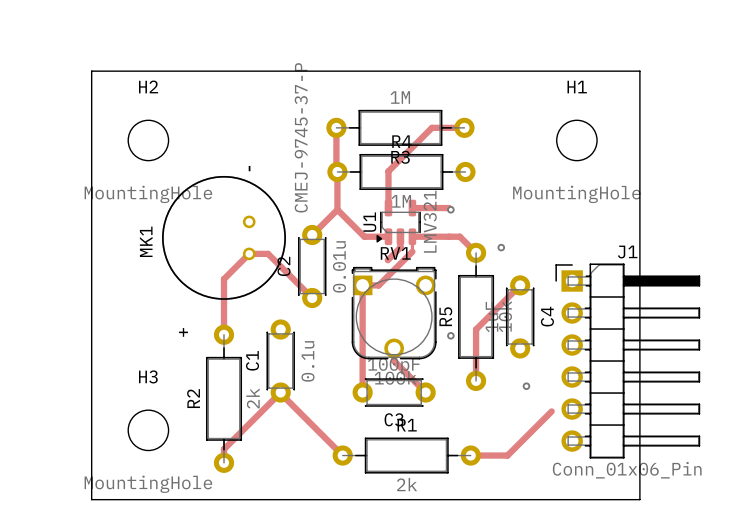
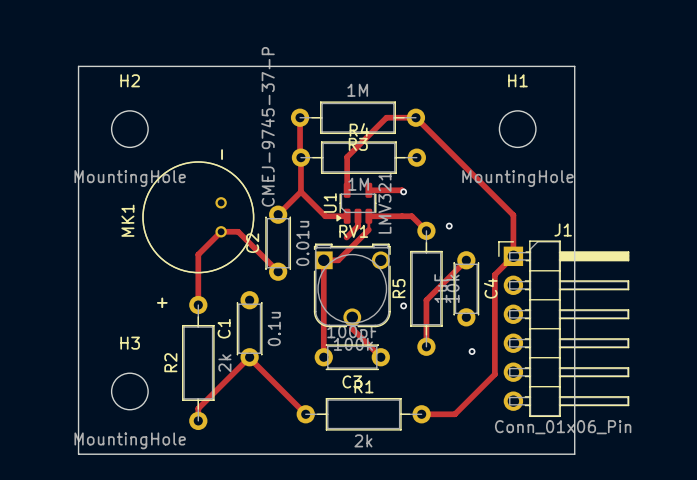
track: none -> (415, 117) (513, 215) (513, 256) (494, 274) (494, 374)

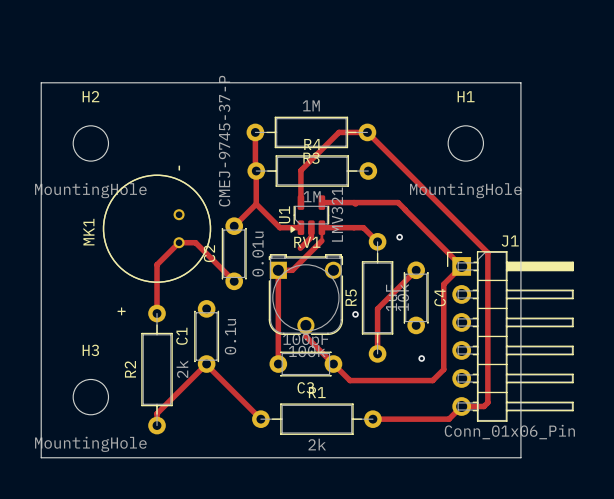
via: (403, 191) -> none
track: (513, 215) (513, 256) -> (354, 202) (398, 202) (461, 266)
track: none -> (461, 226) (487, 252) (487, 402) (484, 406) (461, 406) (448, 419) (405, 419)
track: (494, 362) (494, 374) (454, 414) -> (443, 369) (432, 380) (350, 380) (333, 364)

